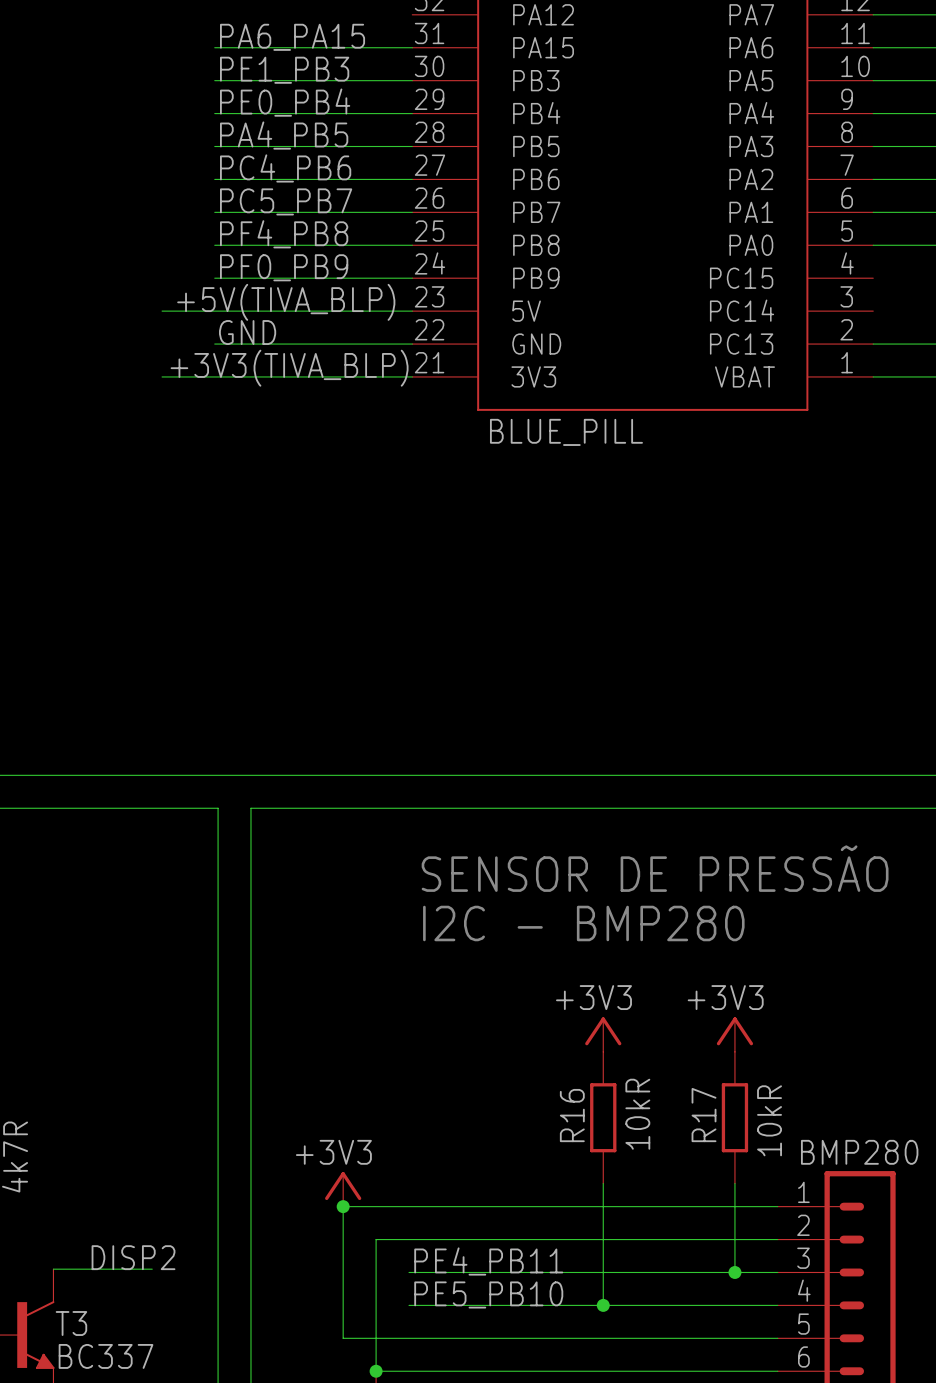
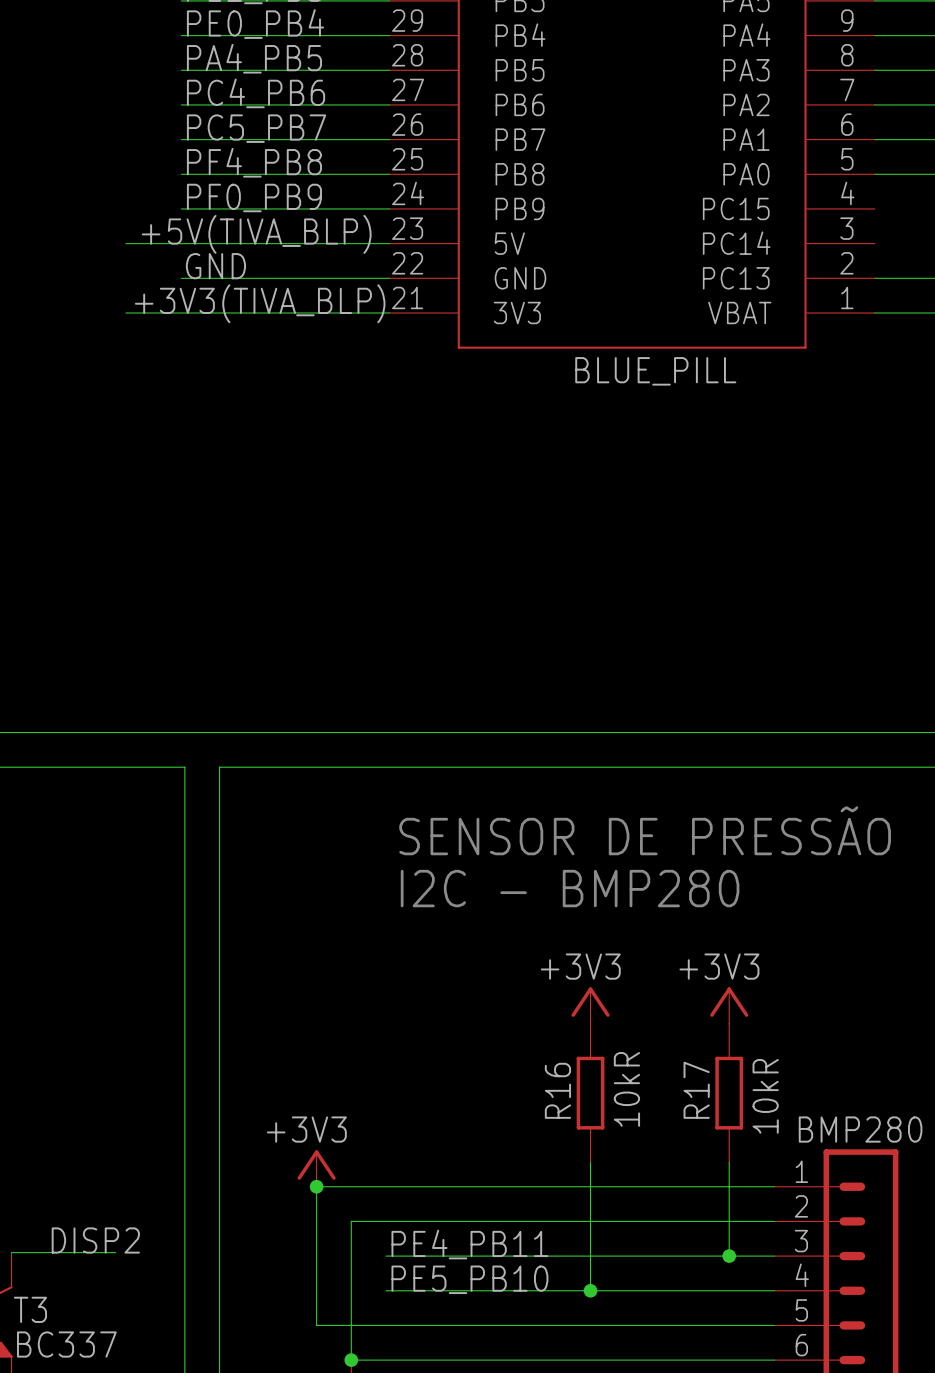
part value position: BLUE_PILL (566, 432) -> BLUE_PILL (655, 371)

